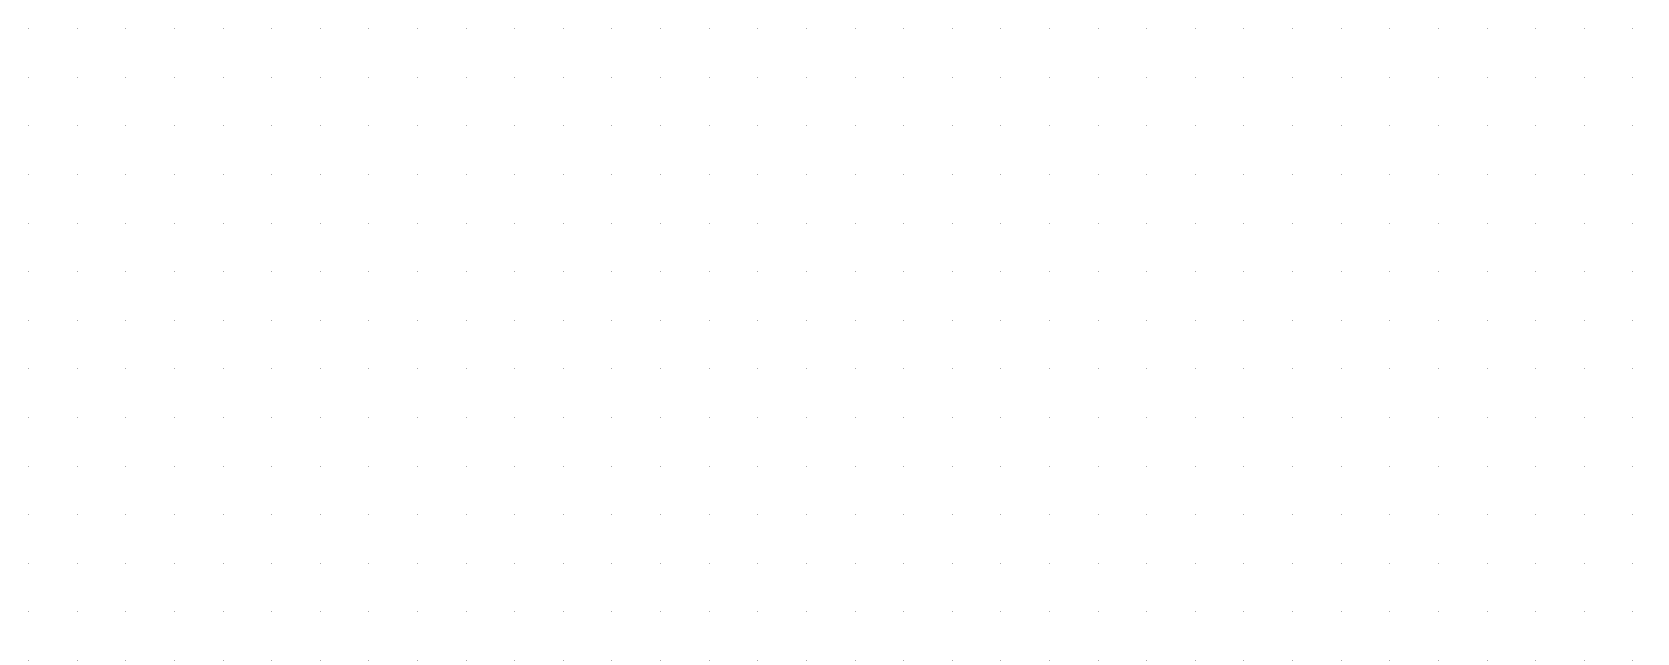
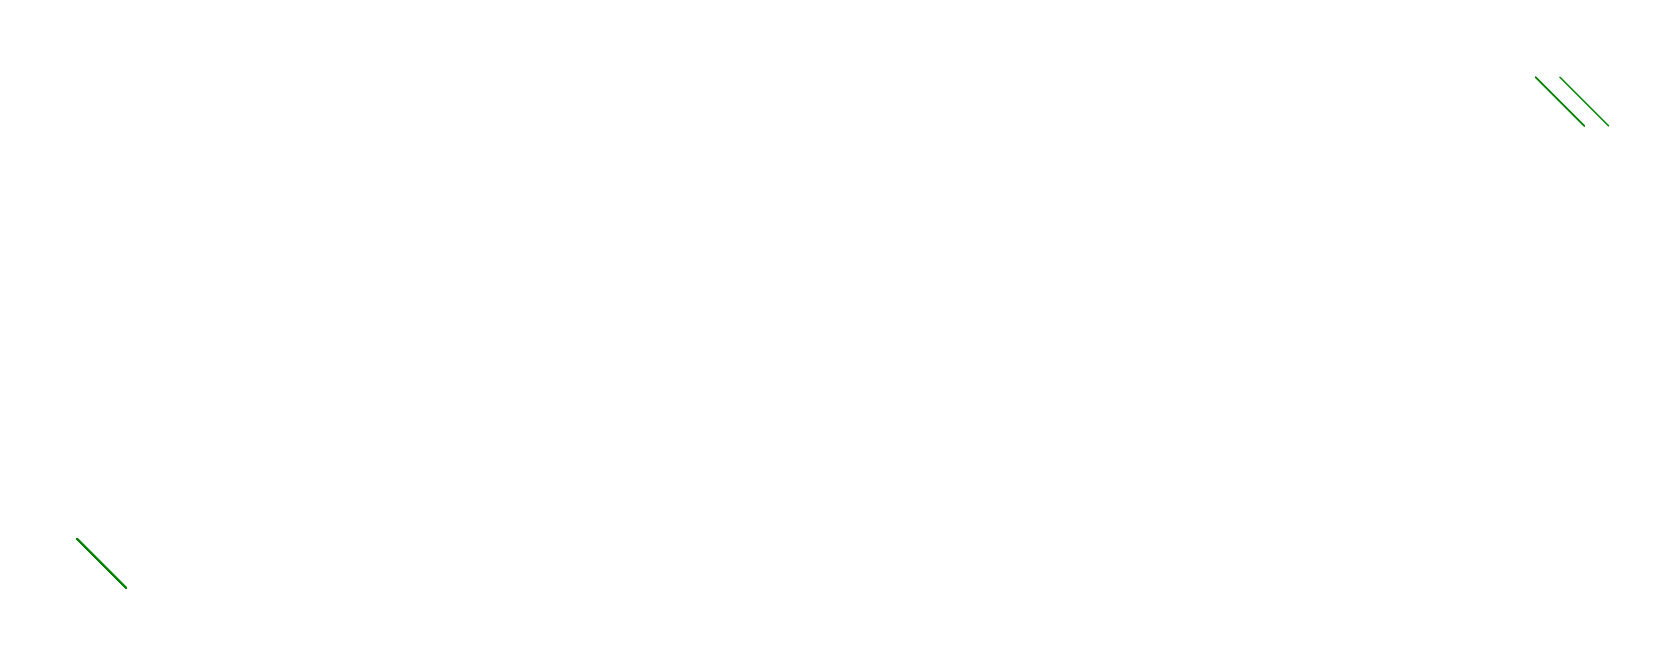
wire: none -> (1535, 77) (1584, 125)
wire: none -> (1559, 77) (1608, 125)
wire: none -> (77, 539) (125, 587)

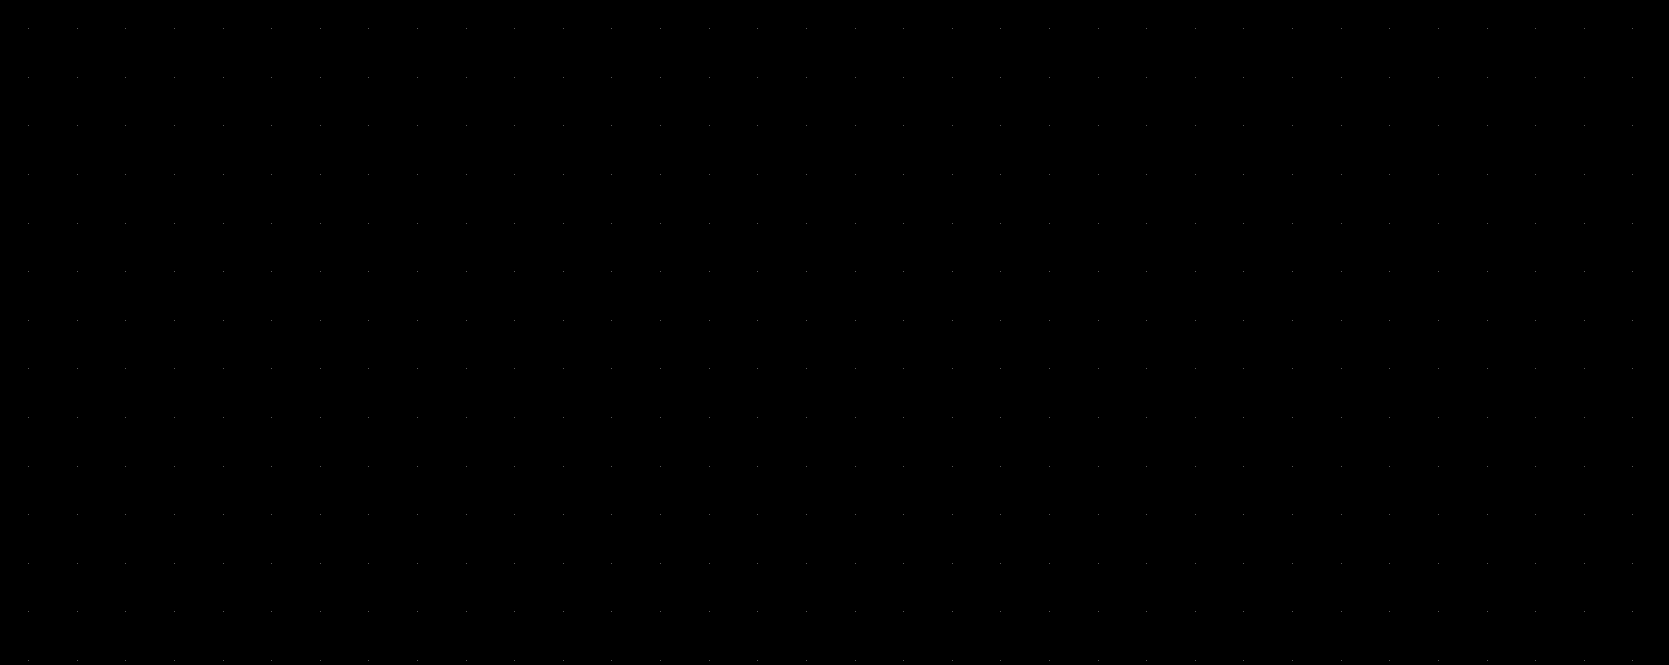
wire: (1535, 77) (1584, 125) -> none
wire: (1559, 77) (1608, 125) -> none
wire: (77, 539) (125, 587) -> none

